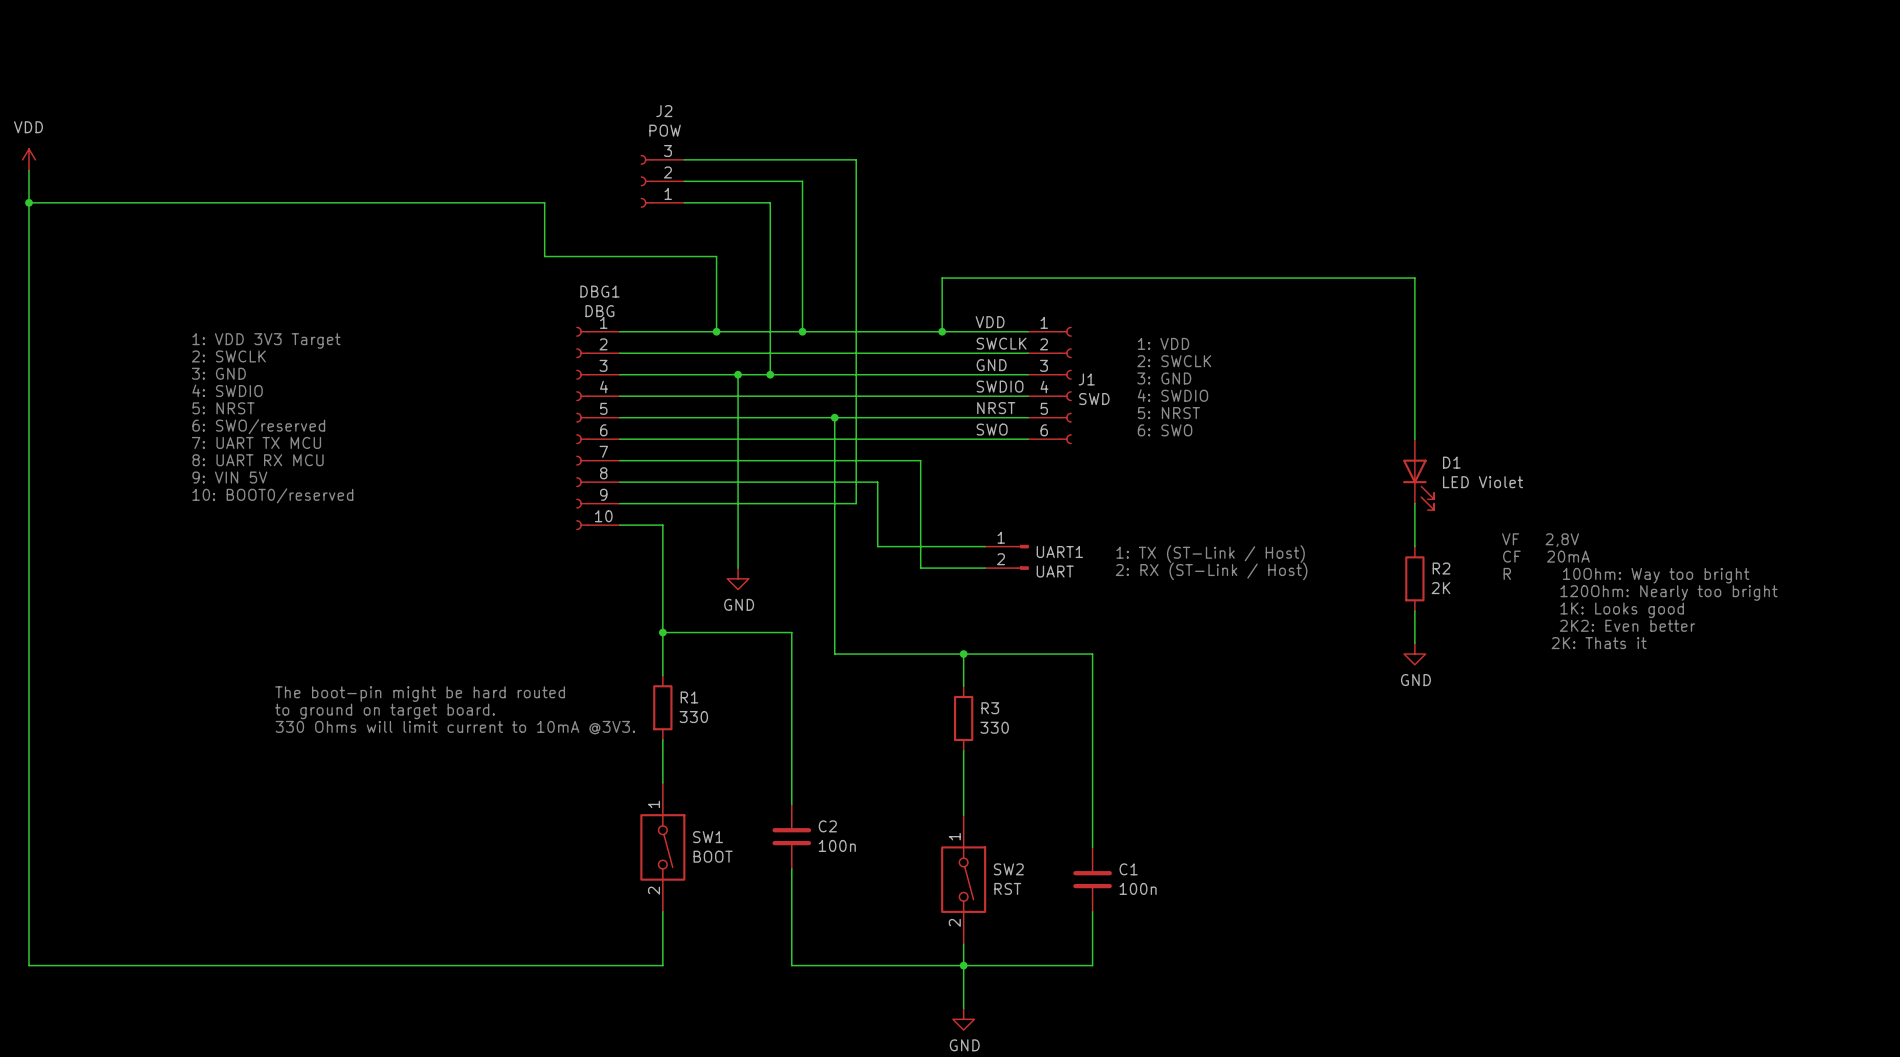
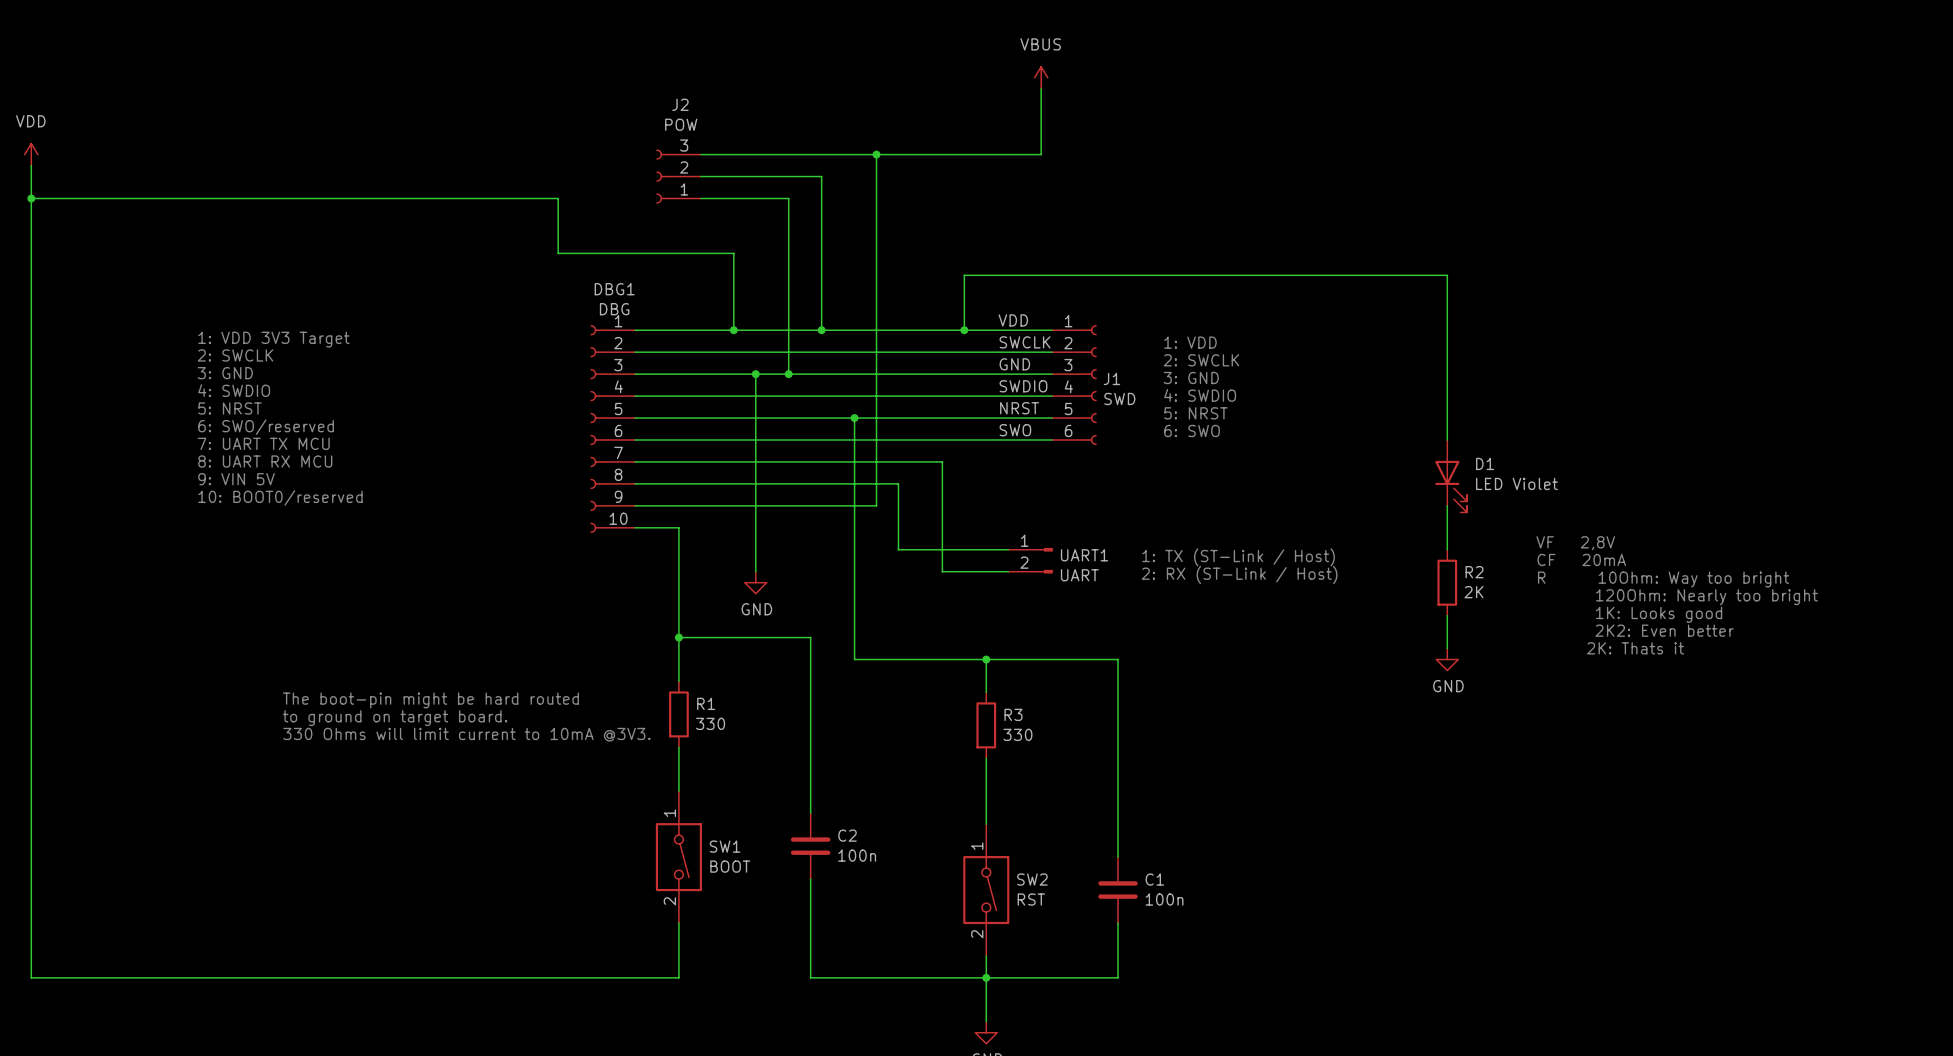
power symbol: none -> VBUS (1041, 77)
wire: none -> (1041, 88) (1041, 154) (876, 154)
junction: none -> (876, 154)

